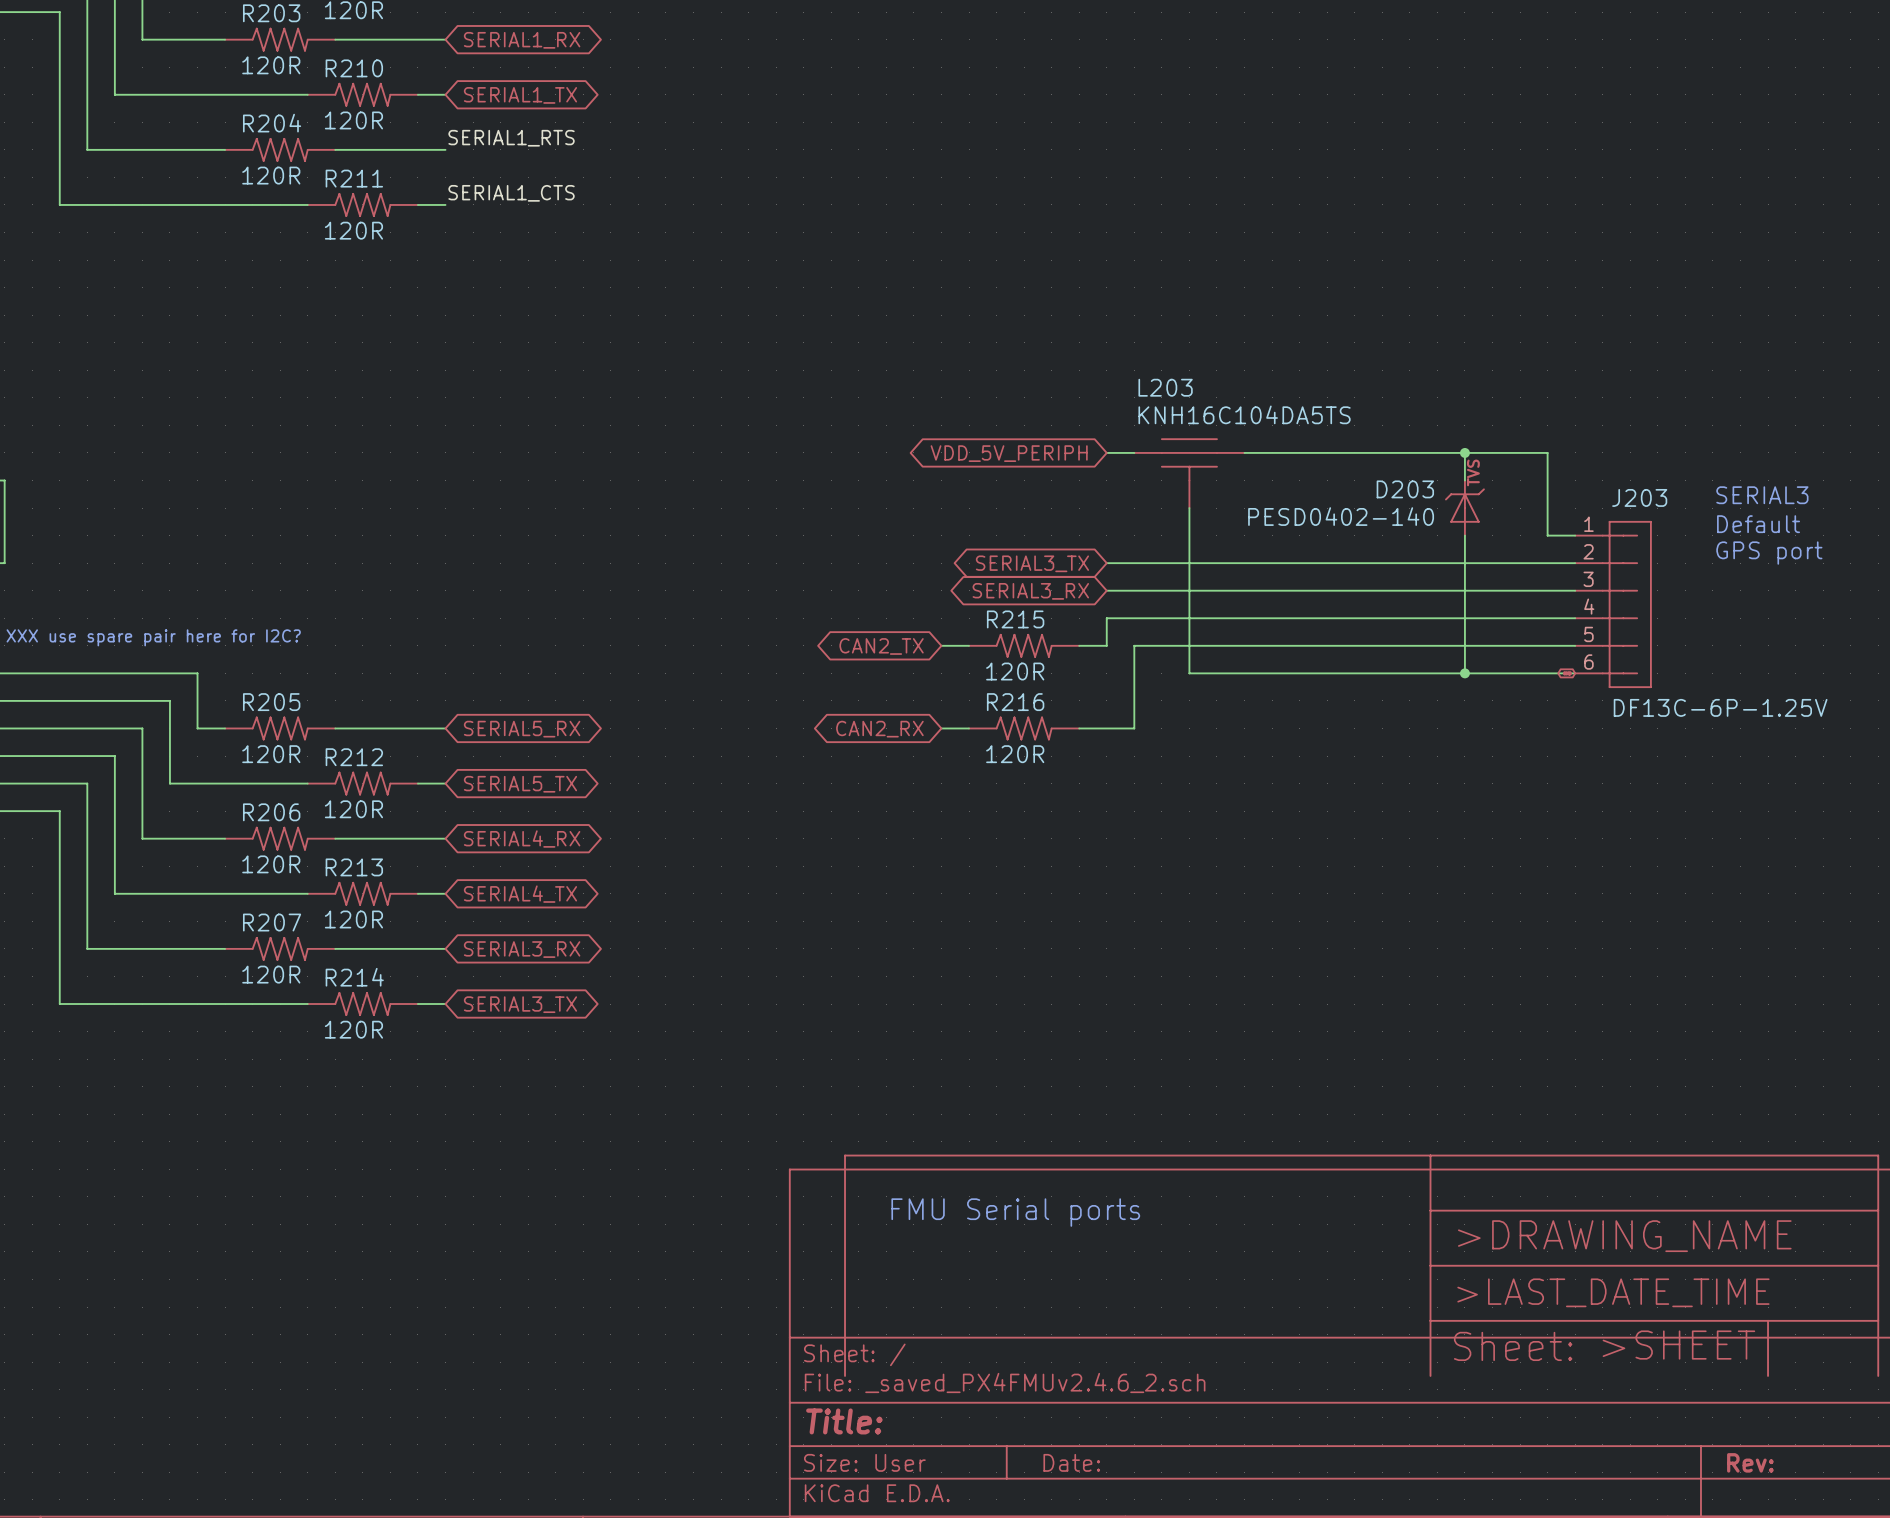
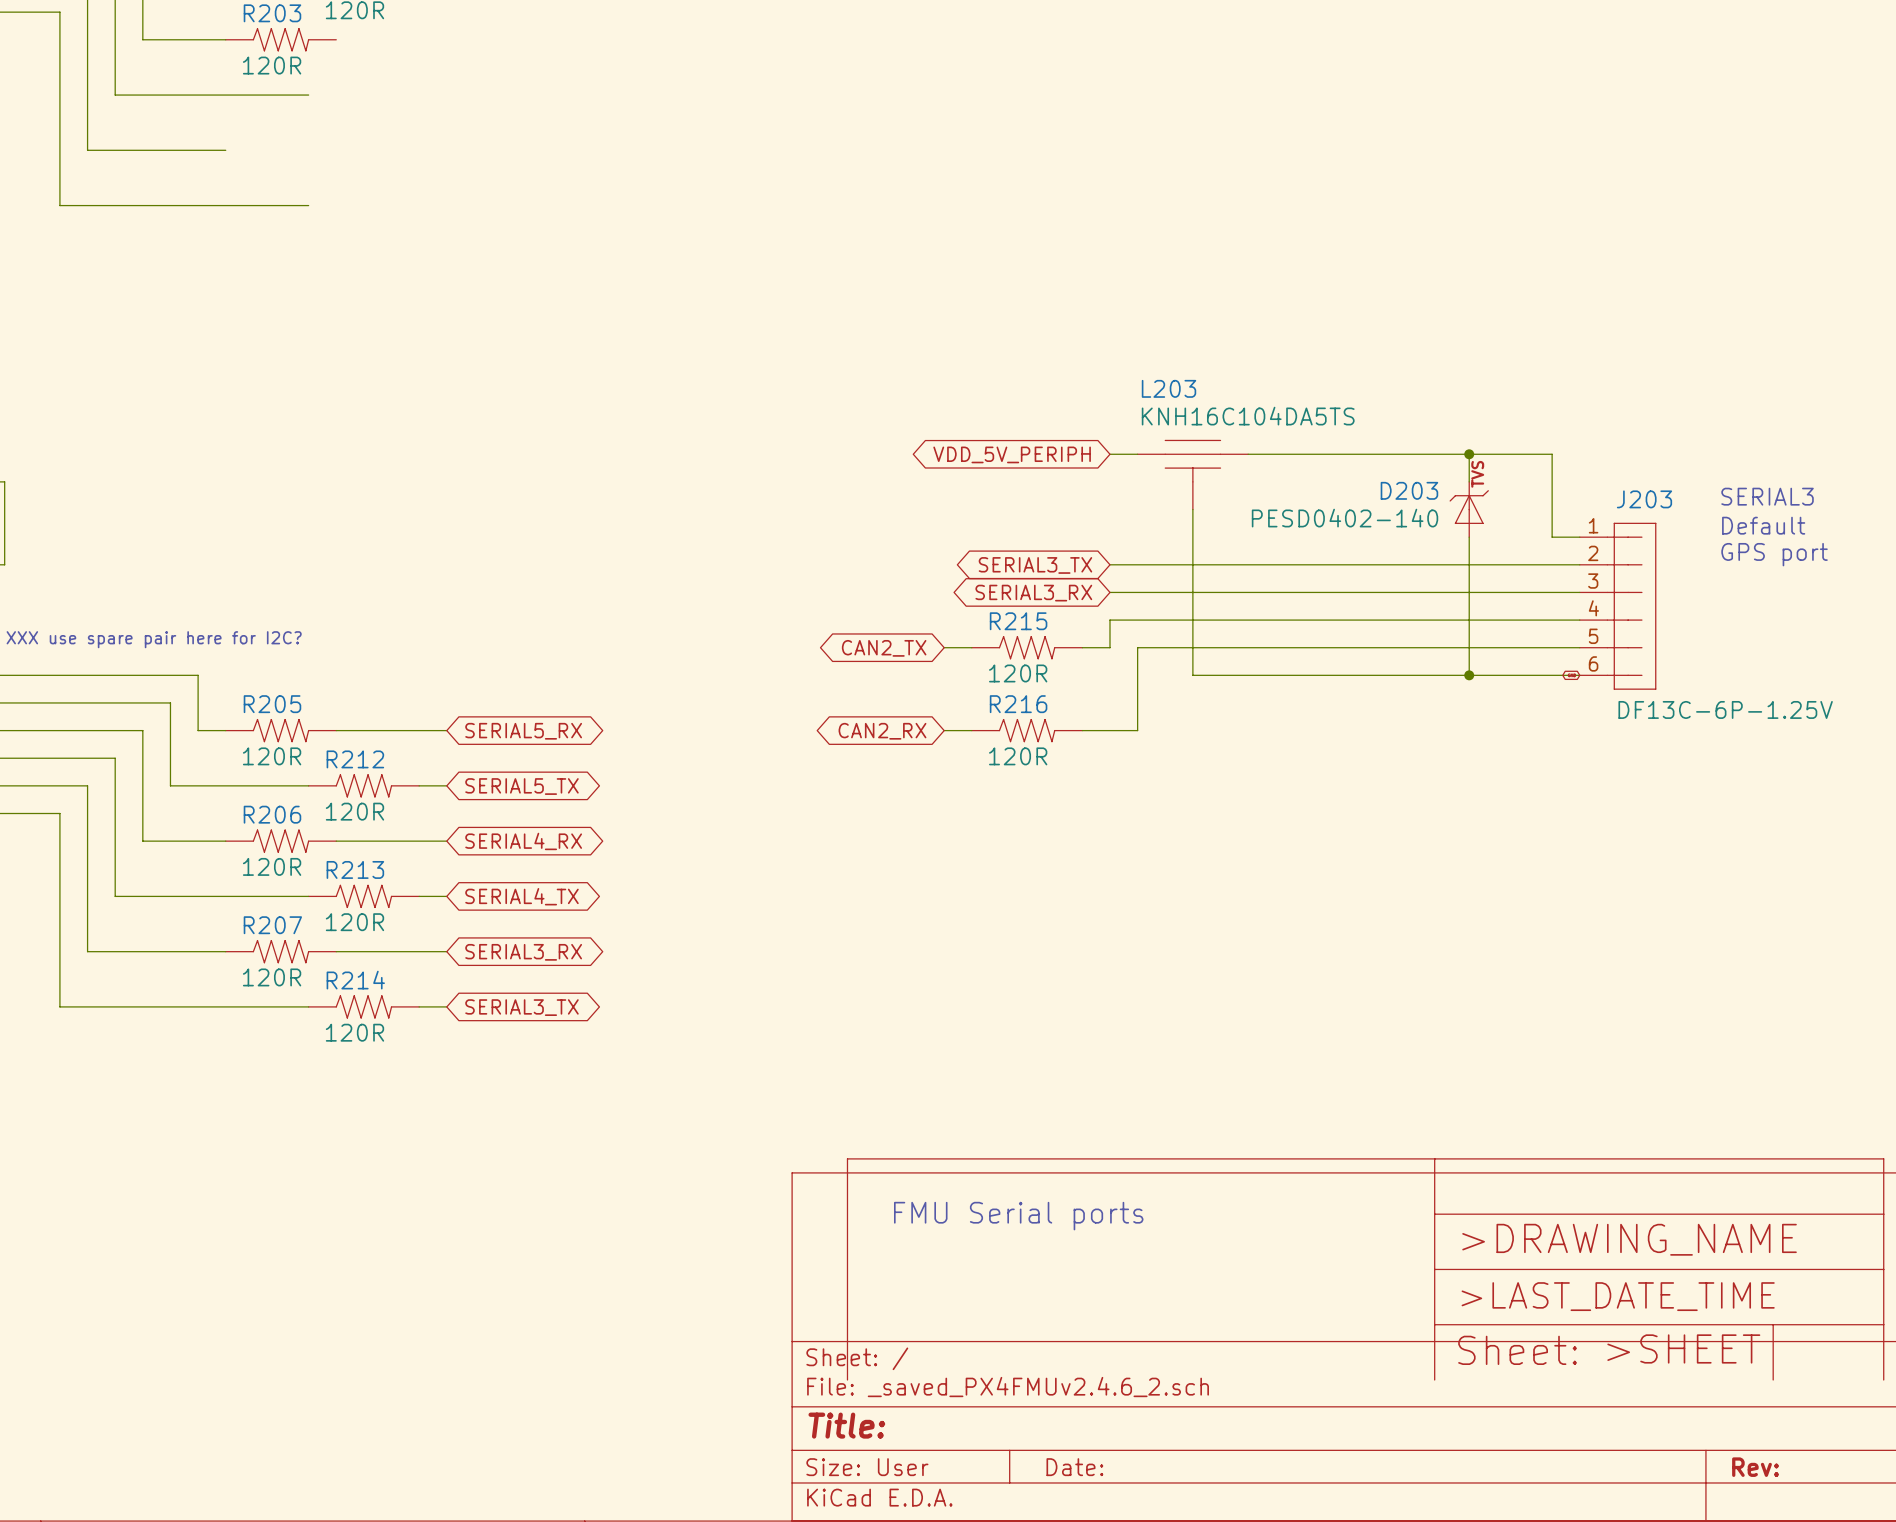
wire: (335, 39) (445, 39) -> none
global label: SERIAL1_RX (522, 40) -> none
R210: 120R (362, 94) -> none
wire: (417, 94) (445, 94) -> none
global label: SERIAL1_TX (520, 95) -> none
label: SERIAL1_RTS (511, 138) -> none
R204: 120R (280, 149) -> none
wire: (335, 149) (445, 149) -> none
label: SERIAL1_CTS (511, 193) -> none
R211: 120R (362, 204) -> none
wire: (417, 204) (445, 204) -> none

